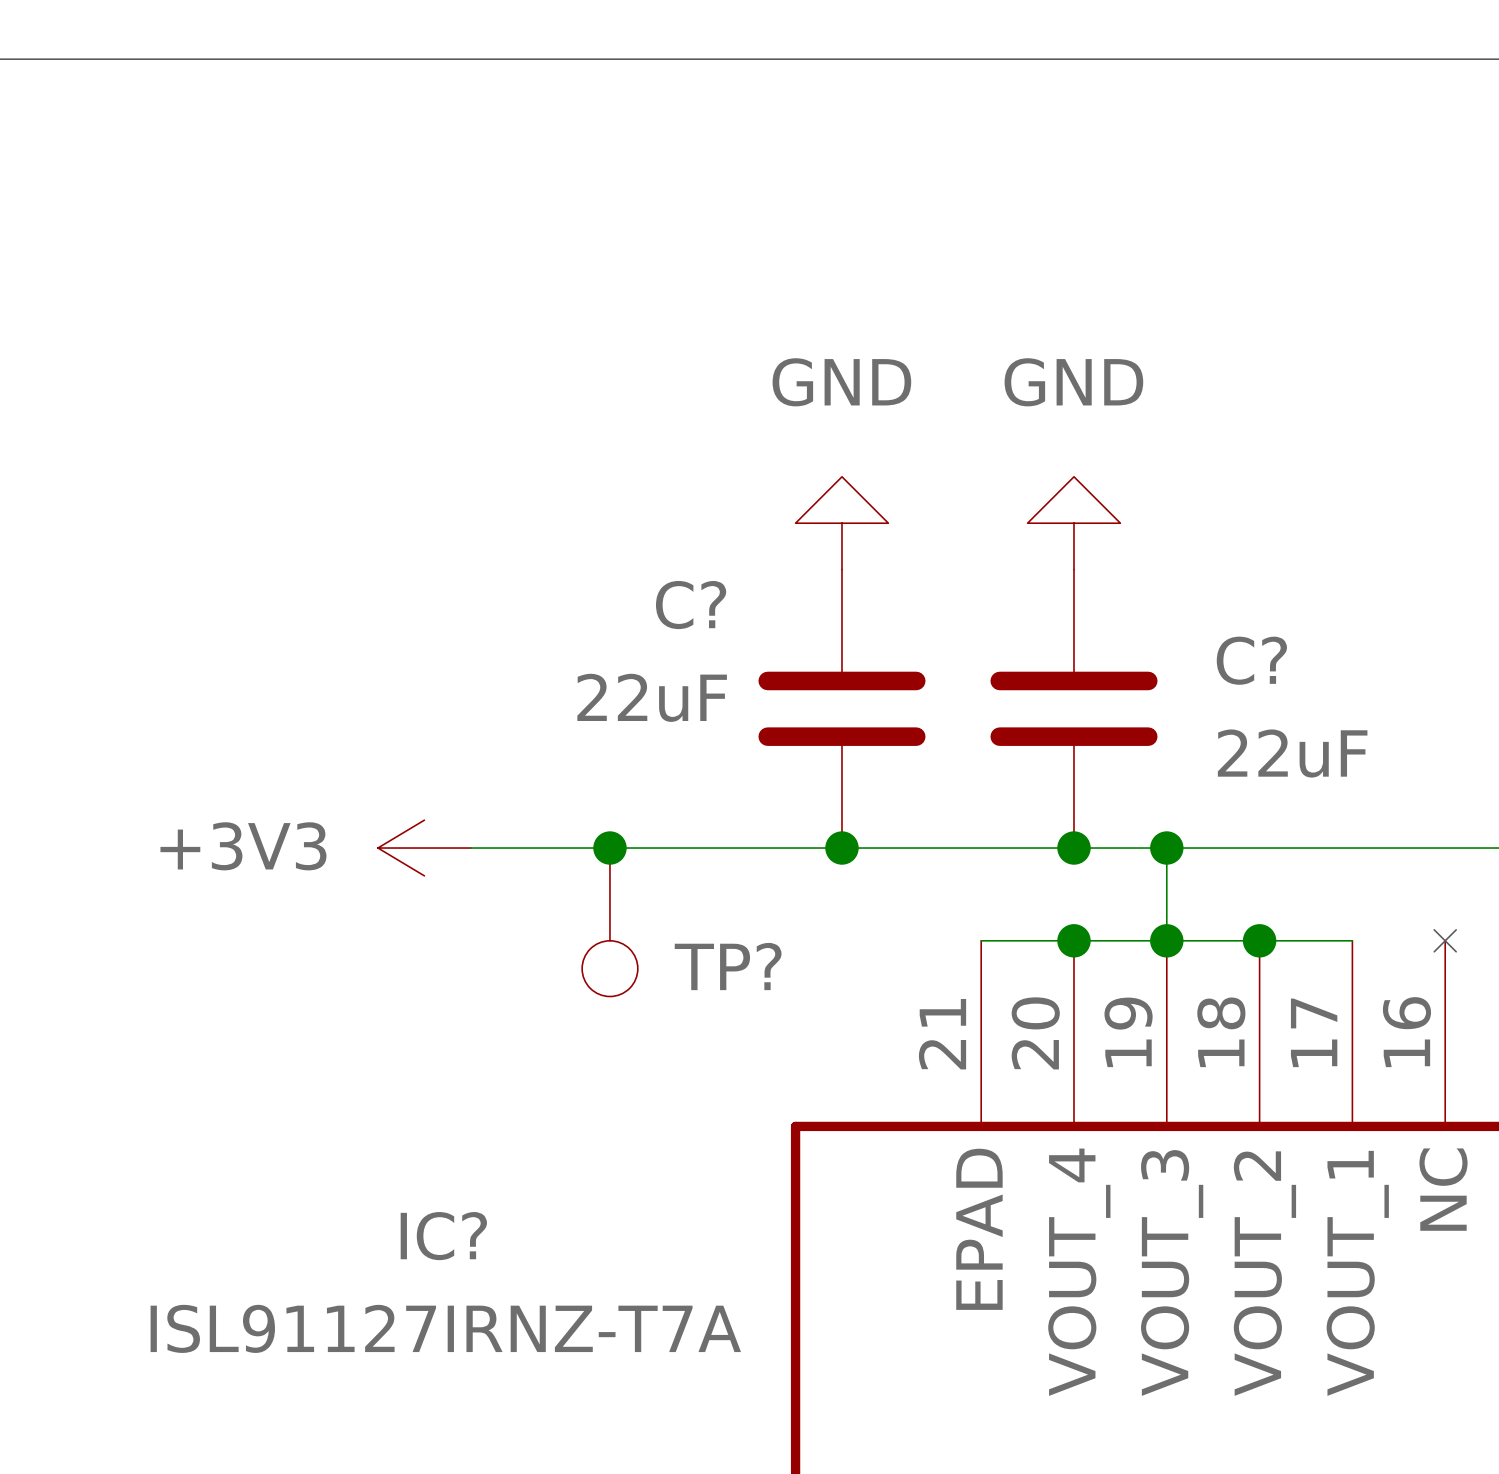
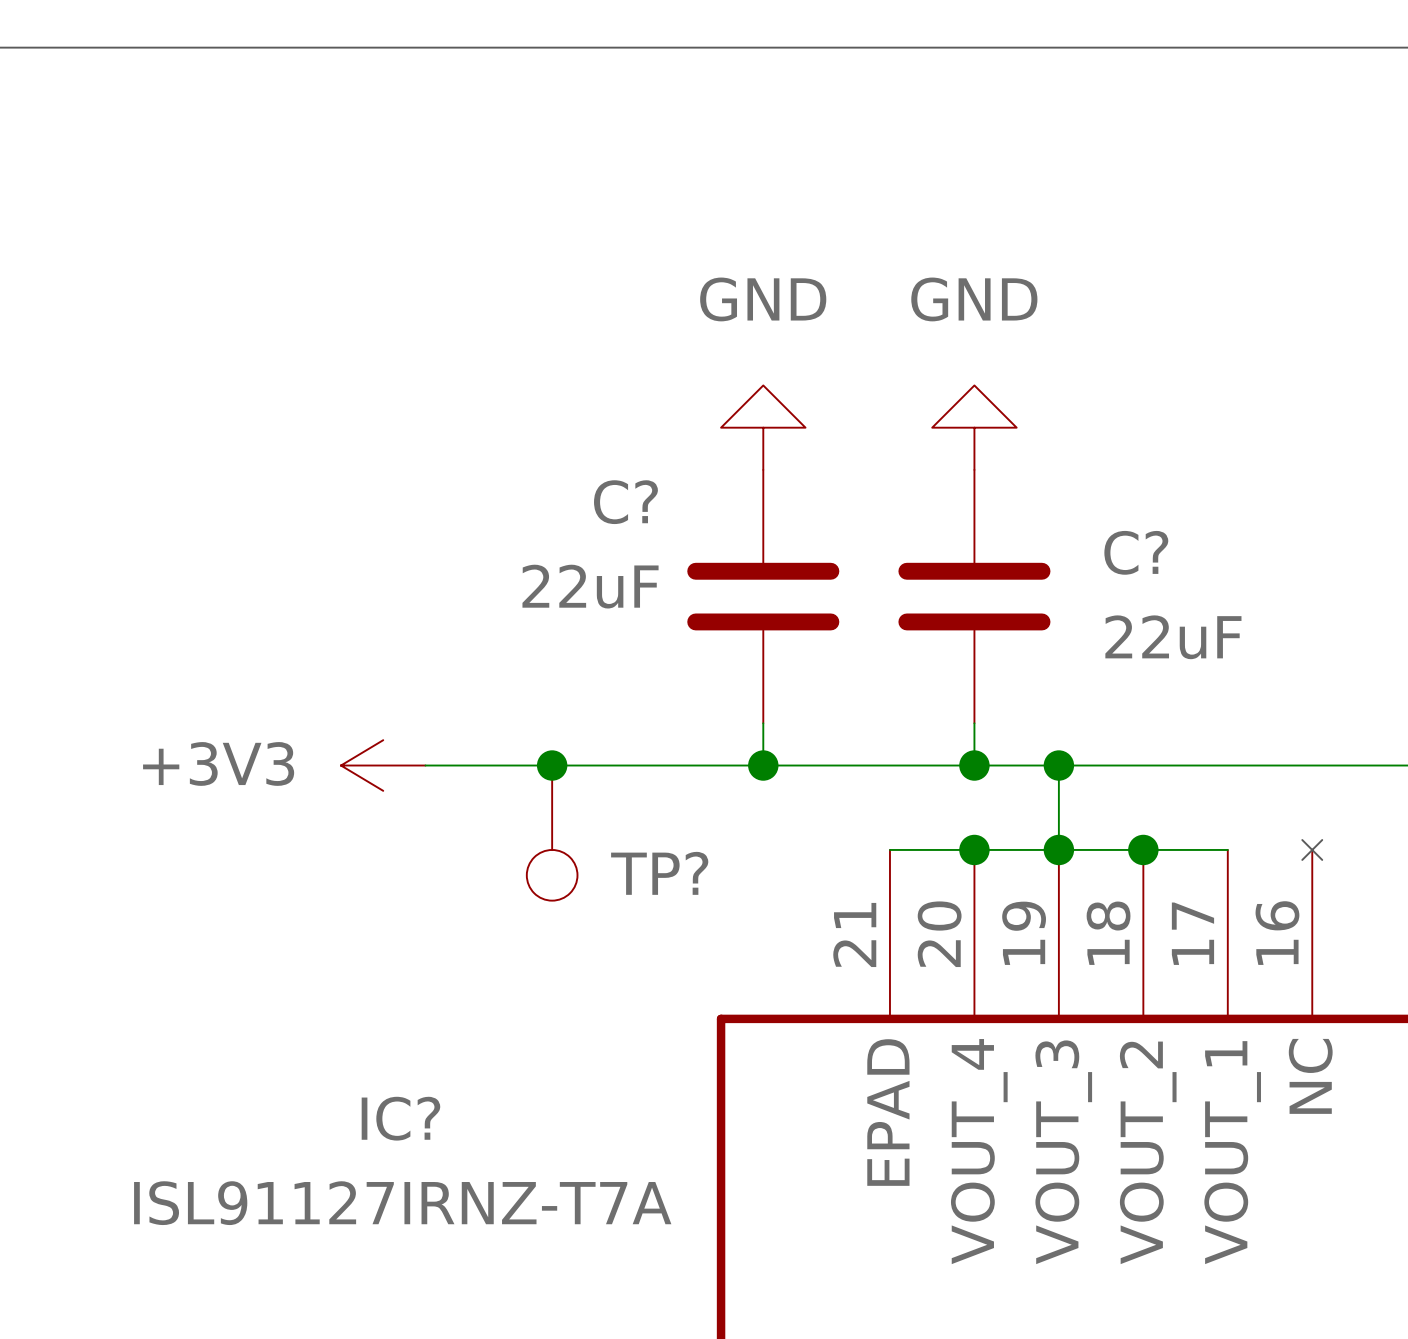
power symbol position: GND (841, 523) -> GND (763, 427)
power symbol position: GND (1073, 523) -> GND (974, 427)
C? position: (841, 708) -> (763, 596)
C? position: (1073, 708) -> (974, 596)

